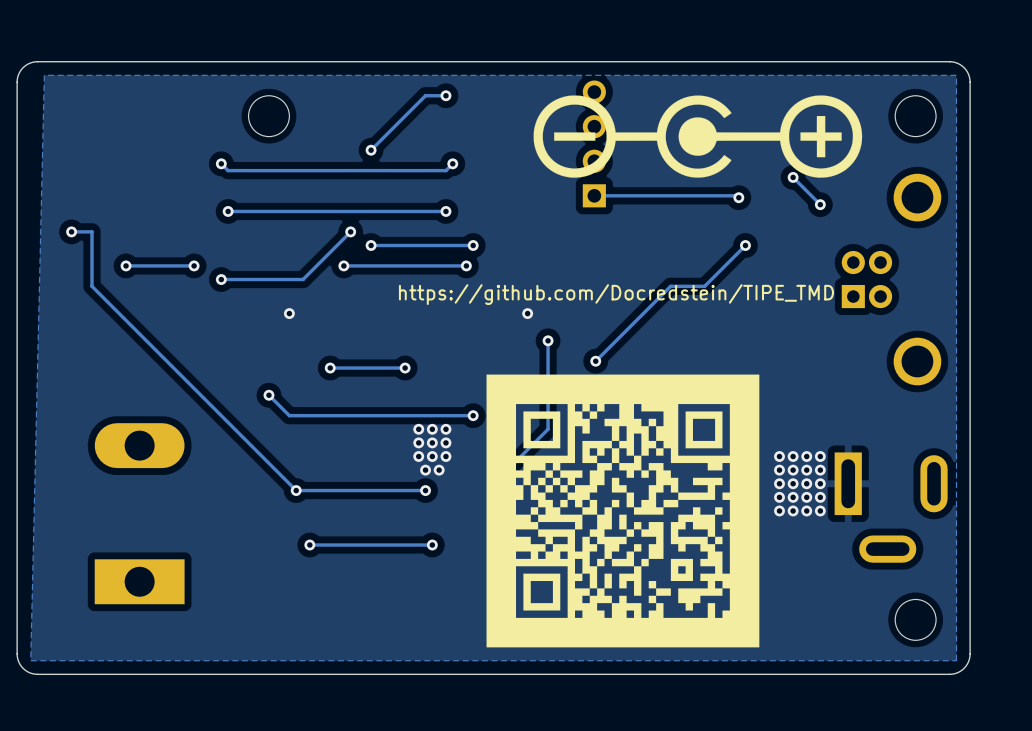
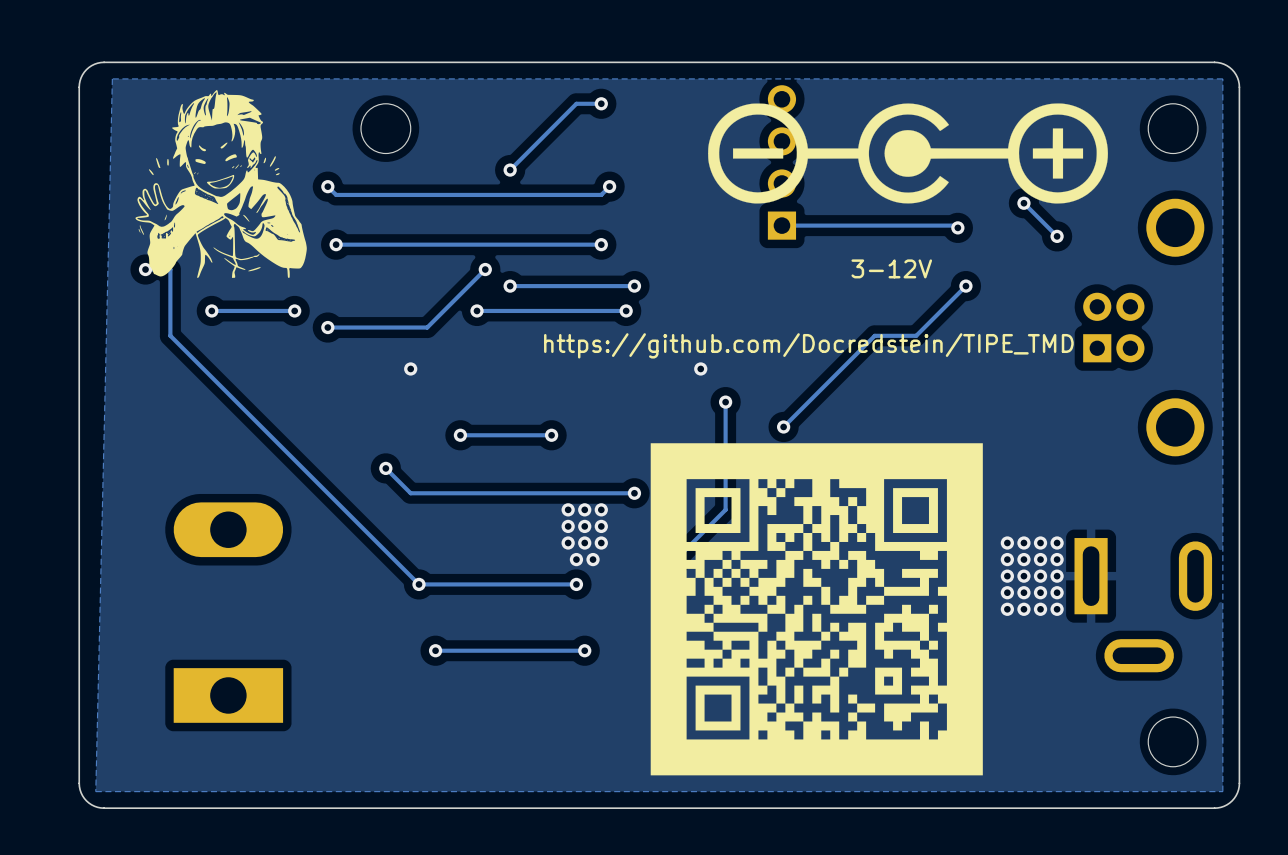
drawing: none -> [135, 90, 307, 278]
text: none -> 3-12V (891, 268)

